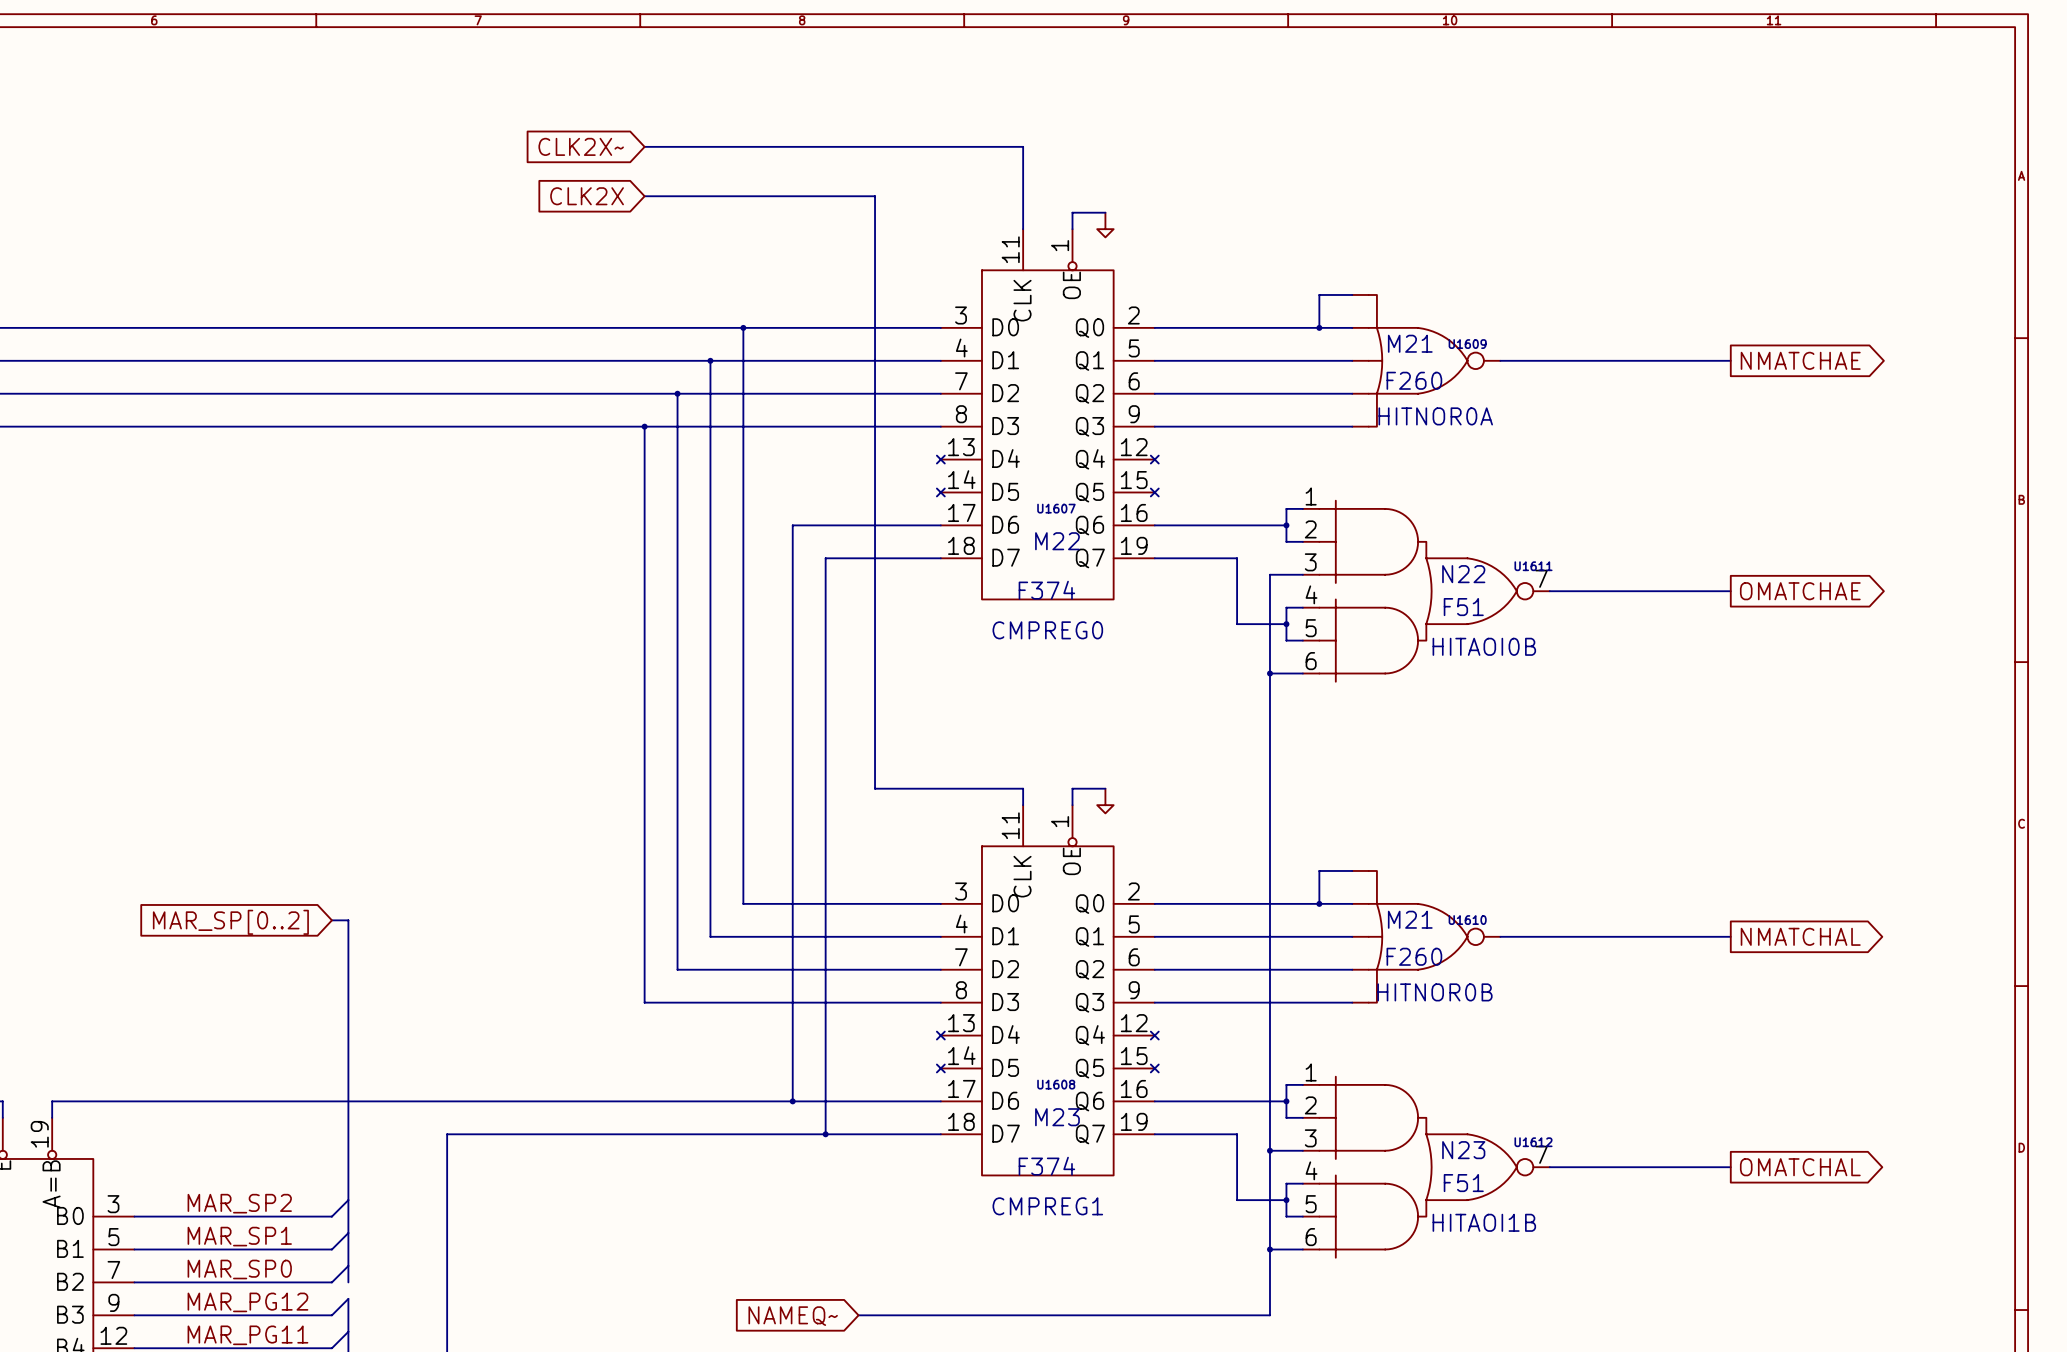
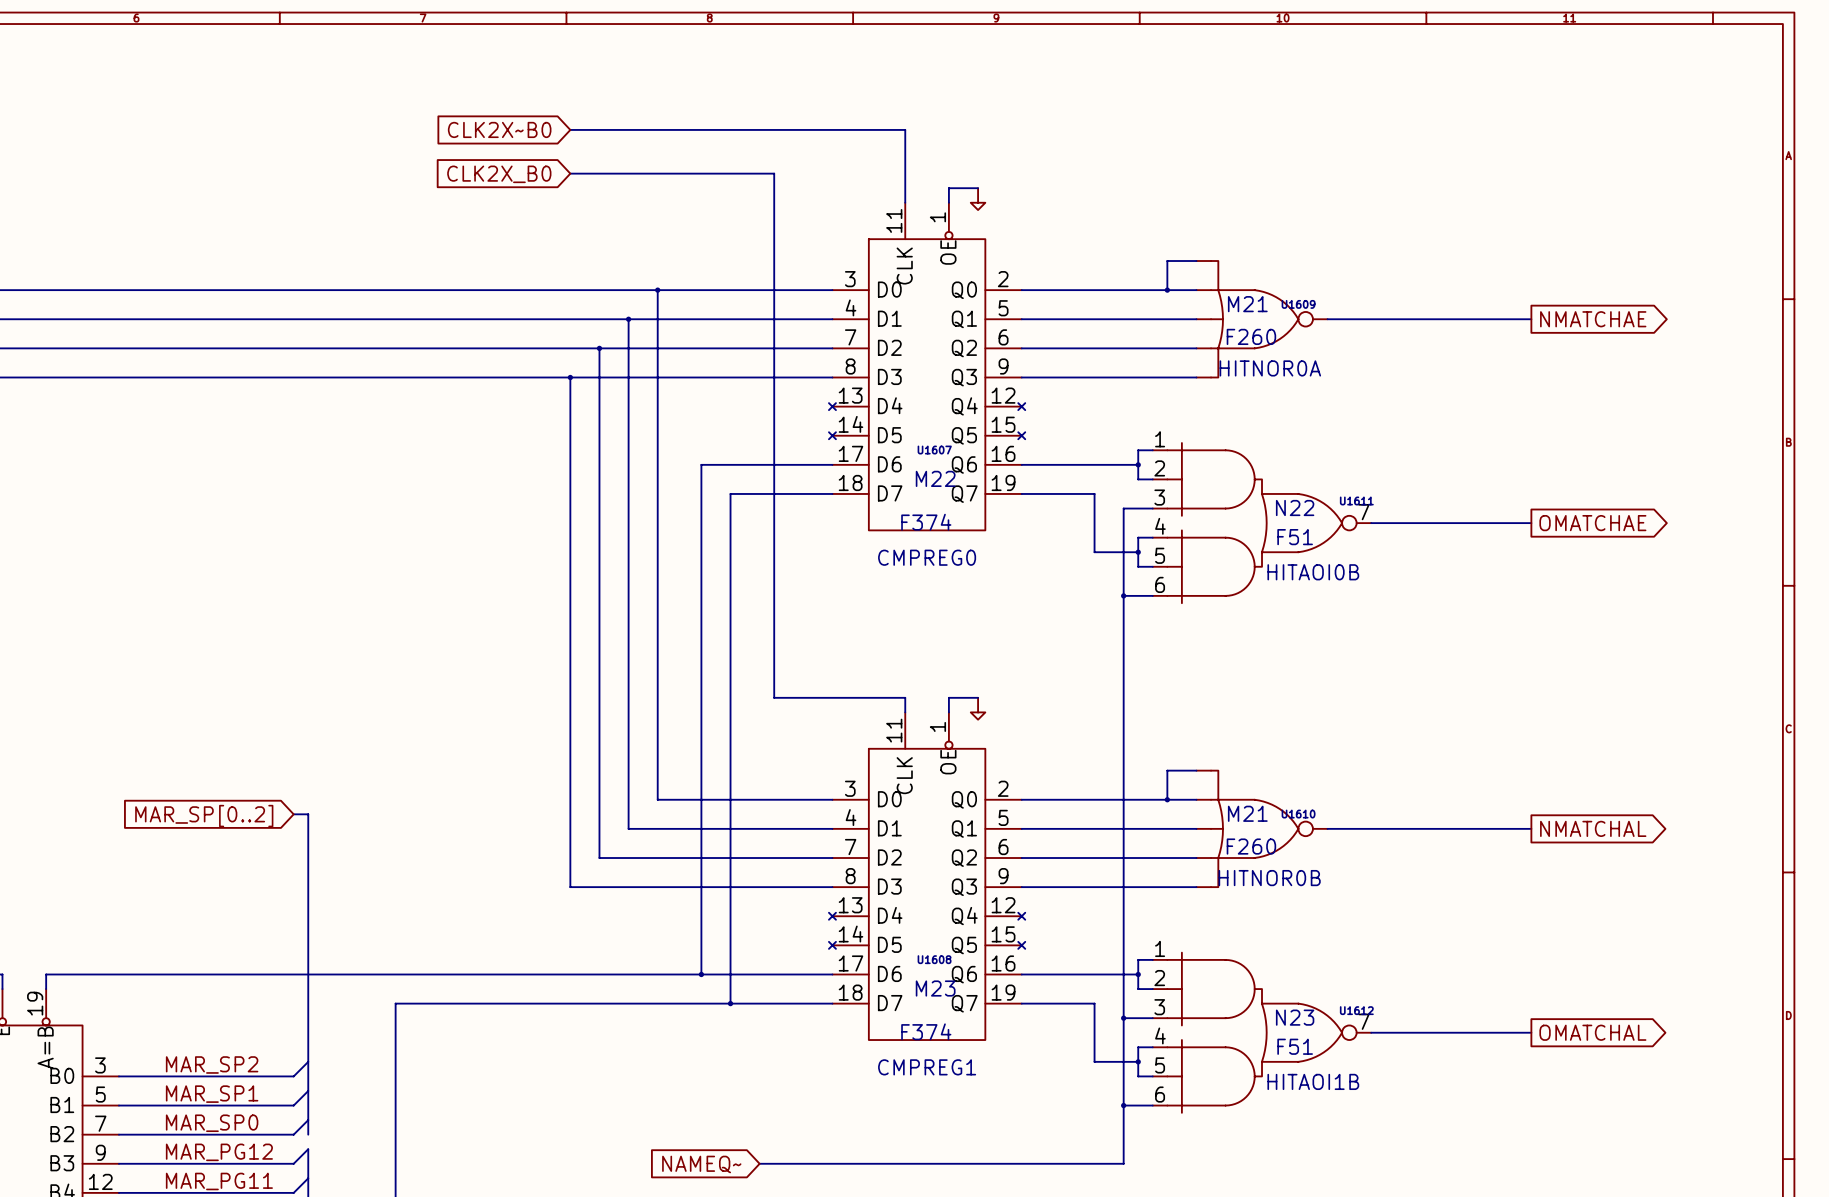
global label: CLK2X~ (581, 146) -> CLK2X~B0 (499, 129)
global label: CLK2X (587, 196) -> CLK2X_B0 (499, 174)

